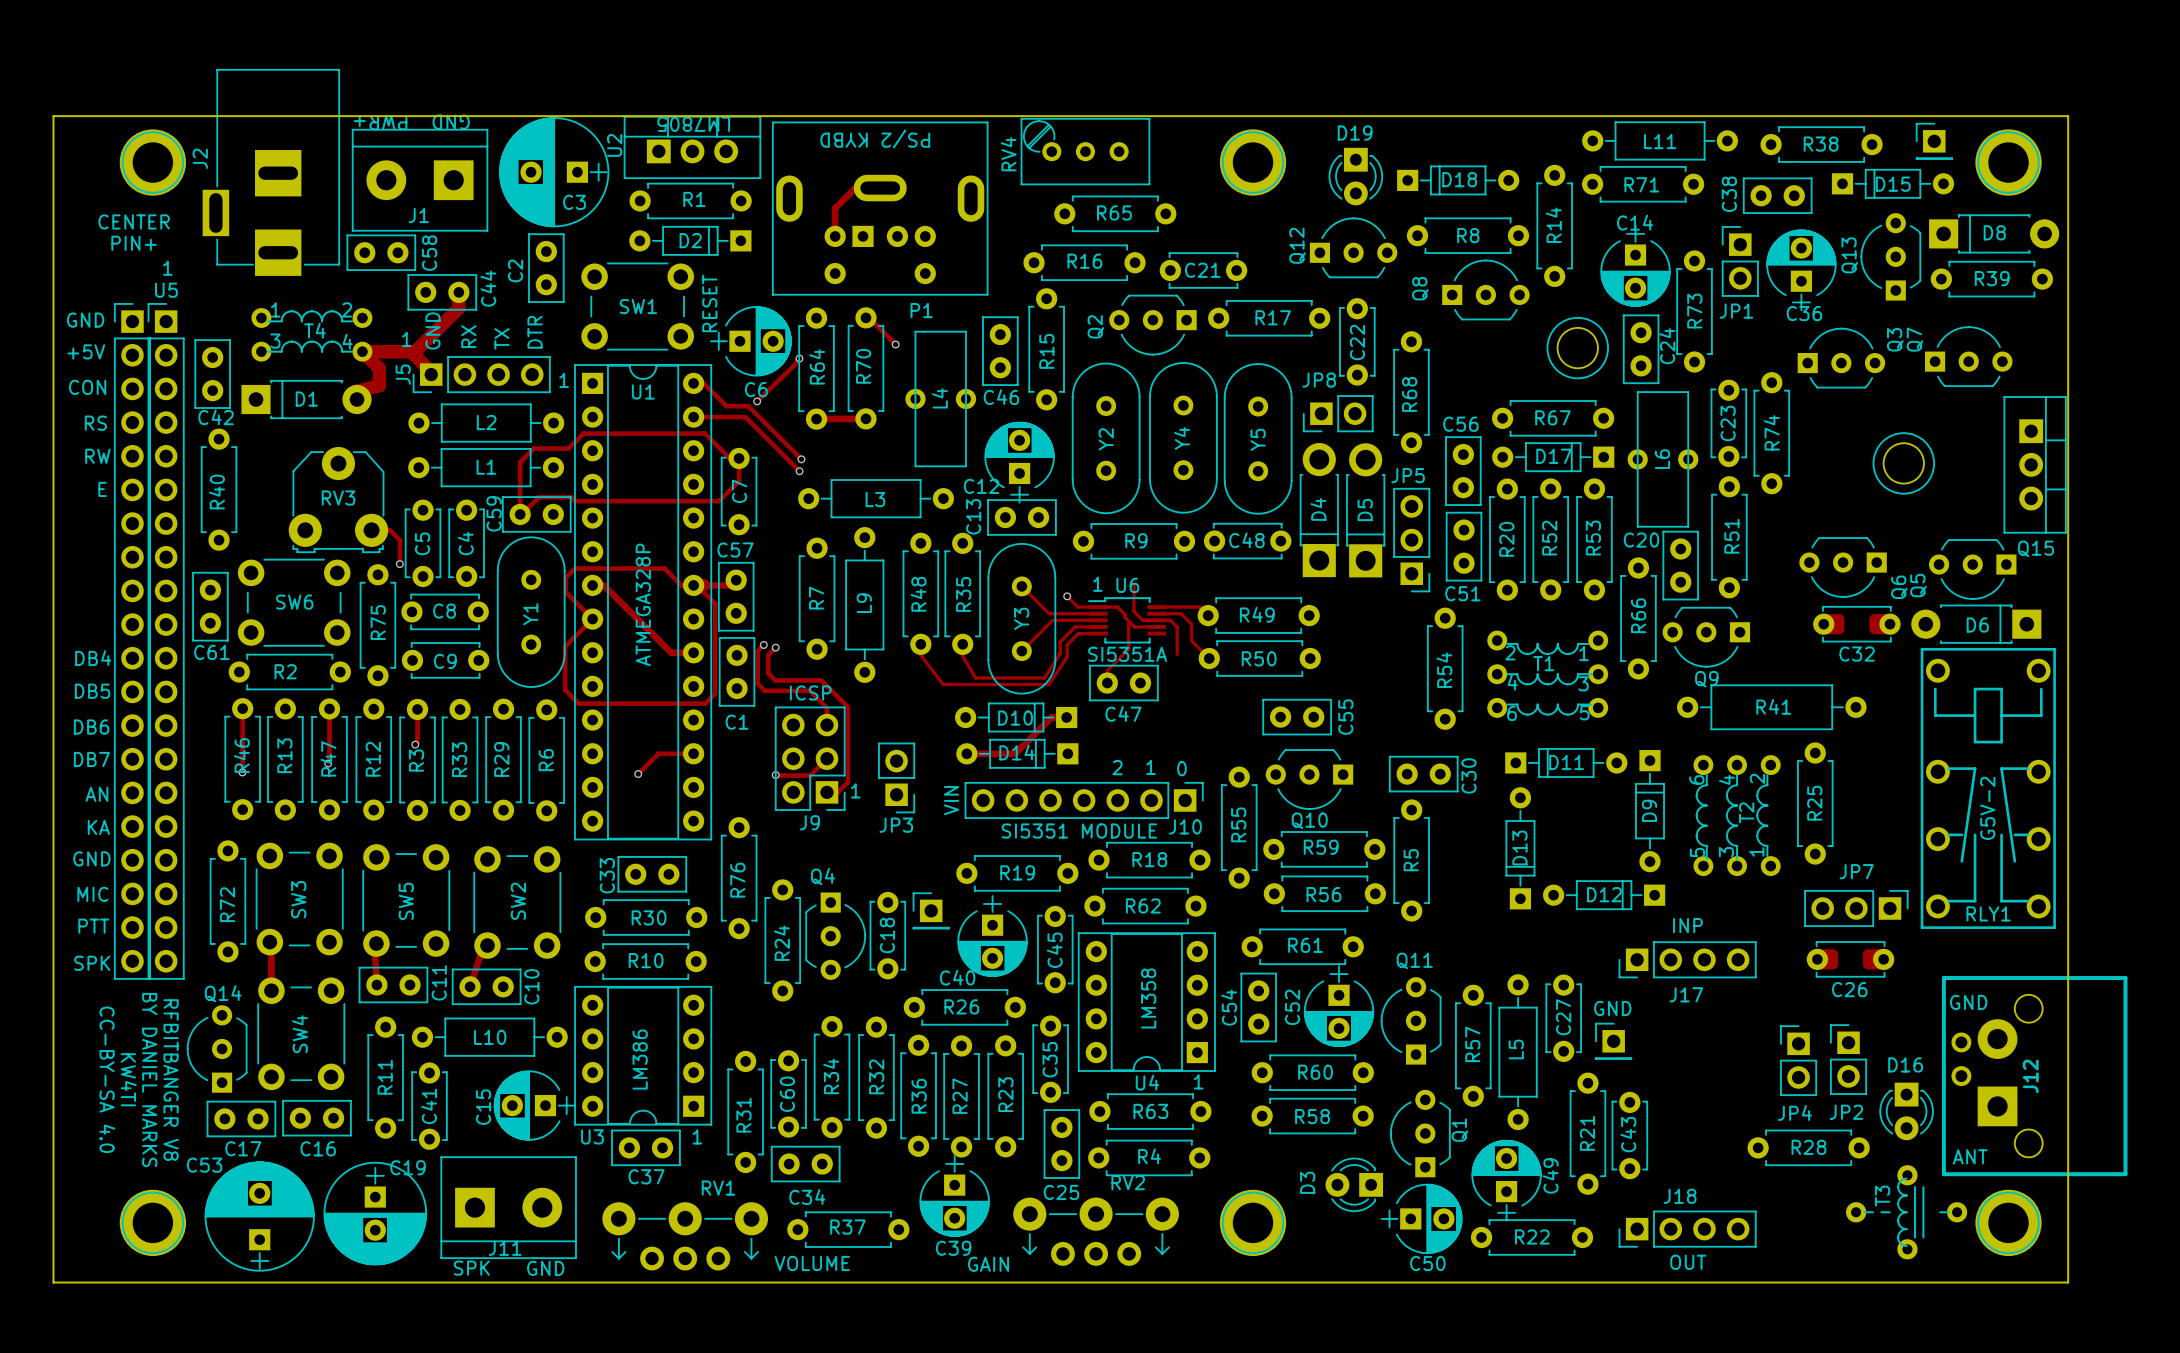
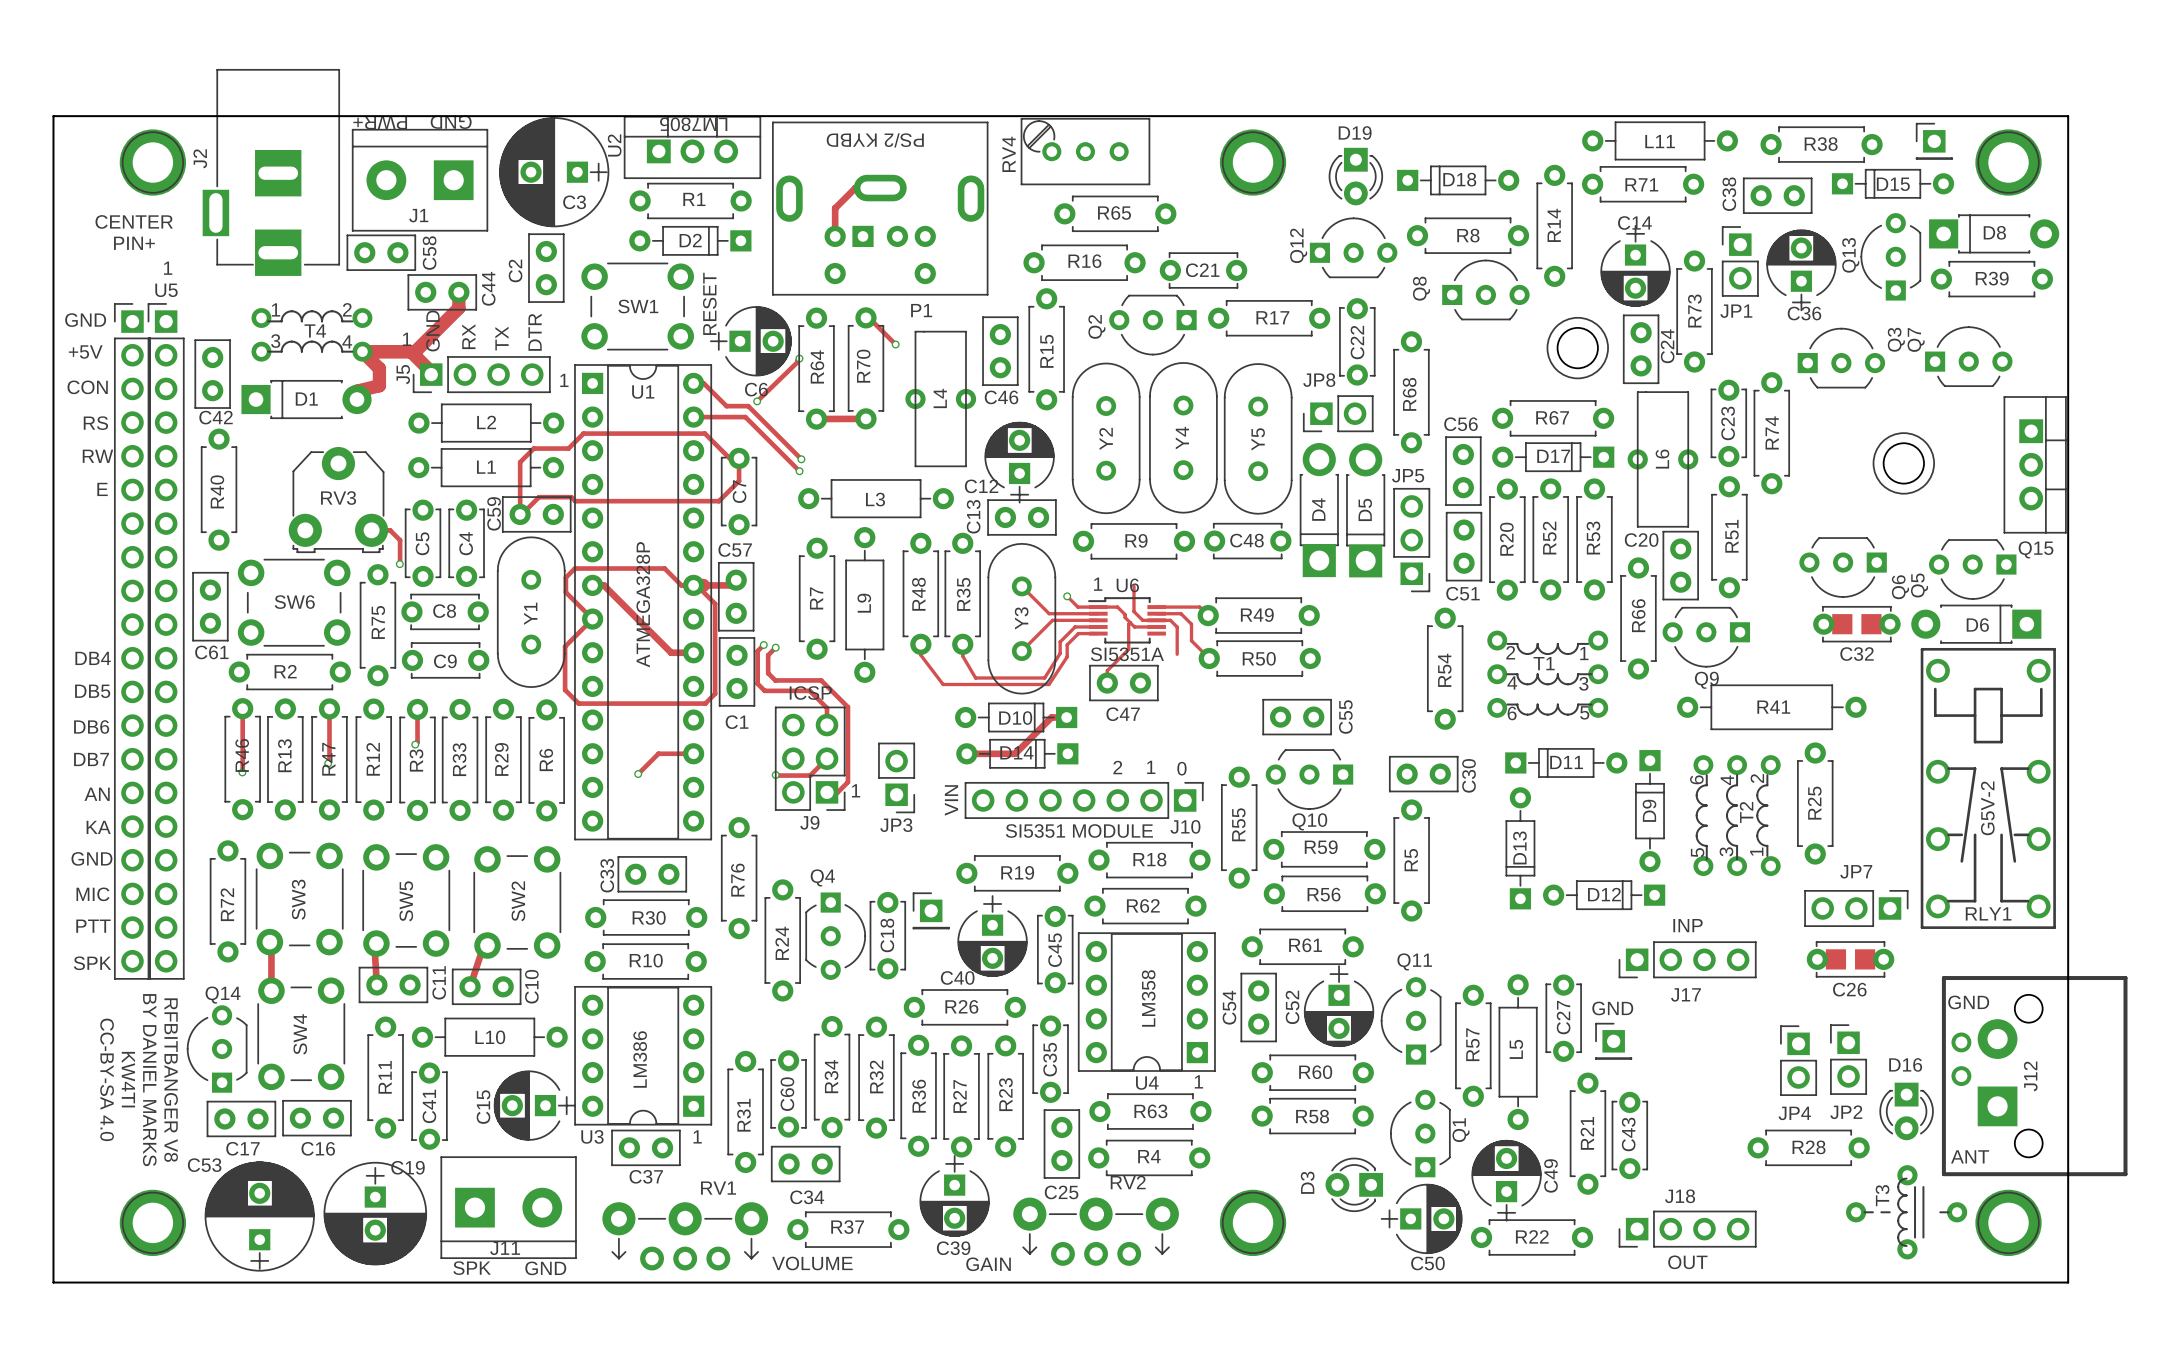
C32 footprint: [1813, 606, 1901, 643] -> [1813, 606, 1901, 643]
C26 footprint: [1806, 941, 1895, 978] -> [1806, 941, 1895, 978]

